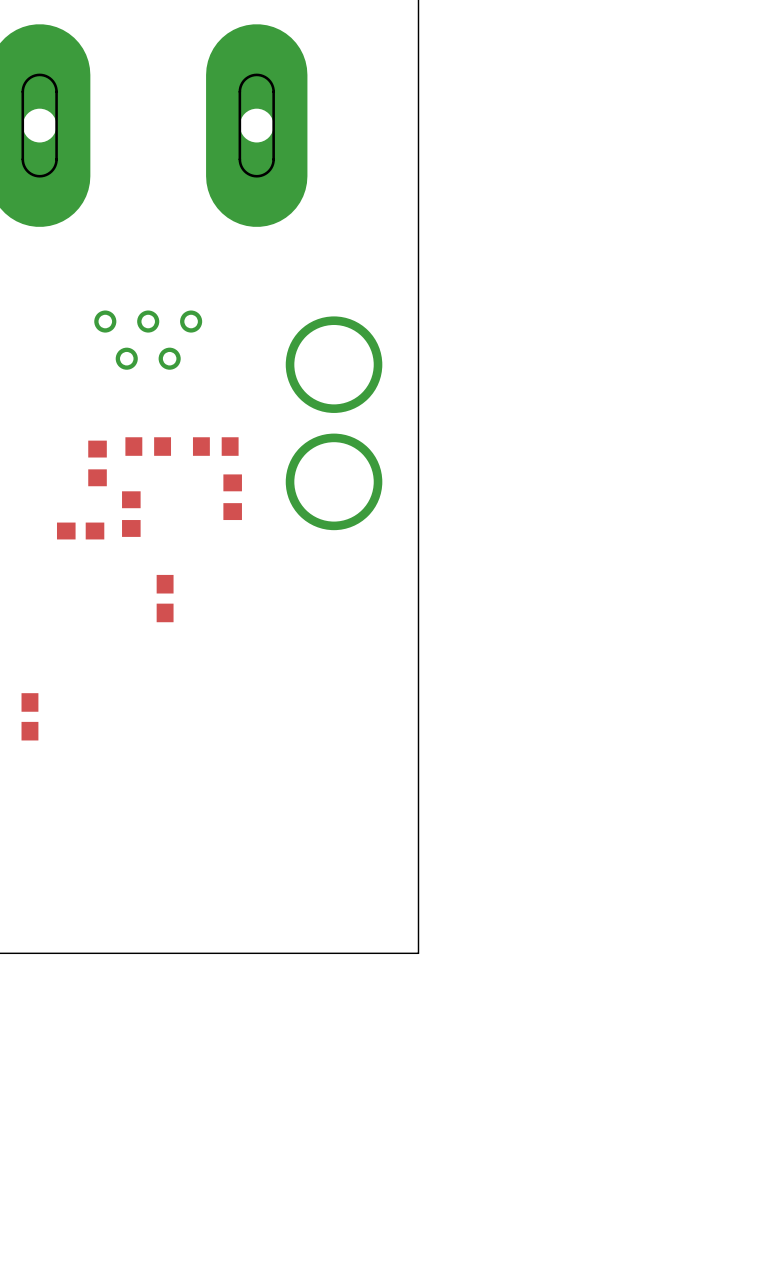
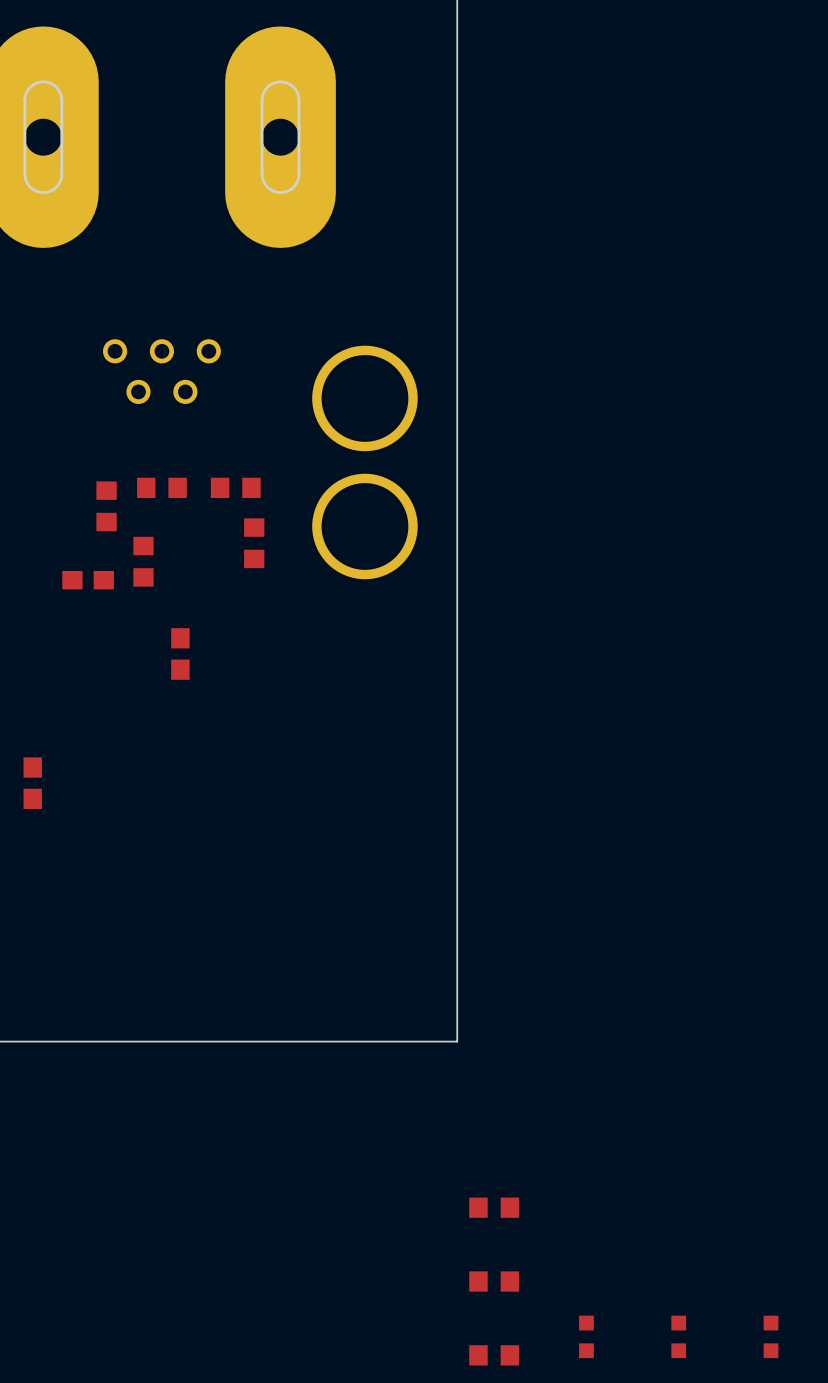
part: none -> (494, 1207)
part: none -> (494, 1281)
part: none -> (586, 1336)
part: none -> (678, 1336)
part: none -> (771, 1336)
part: none -> (494, 1355)

